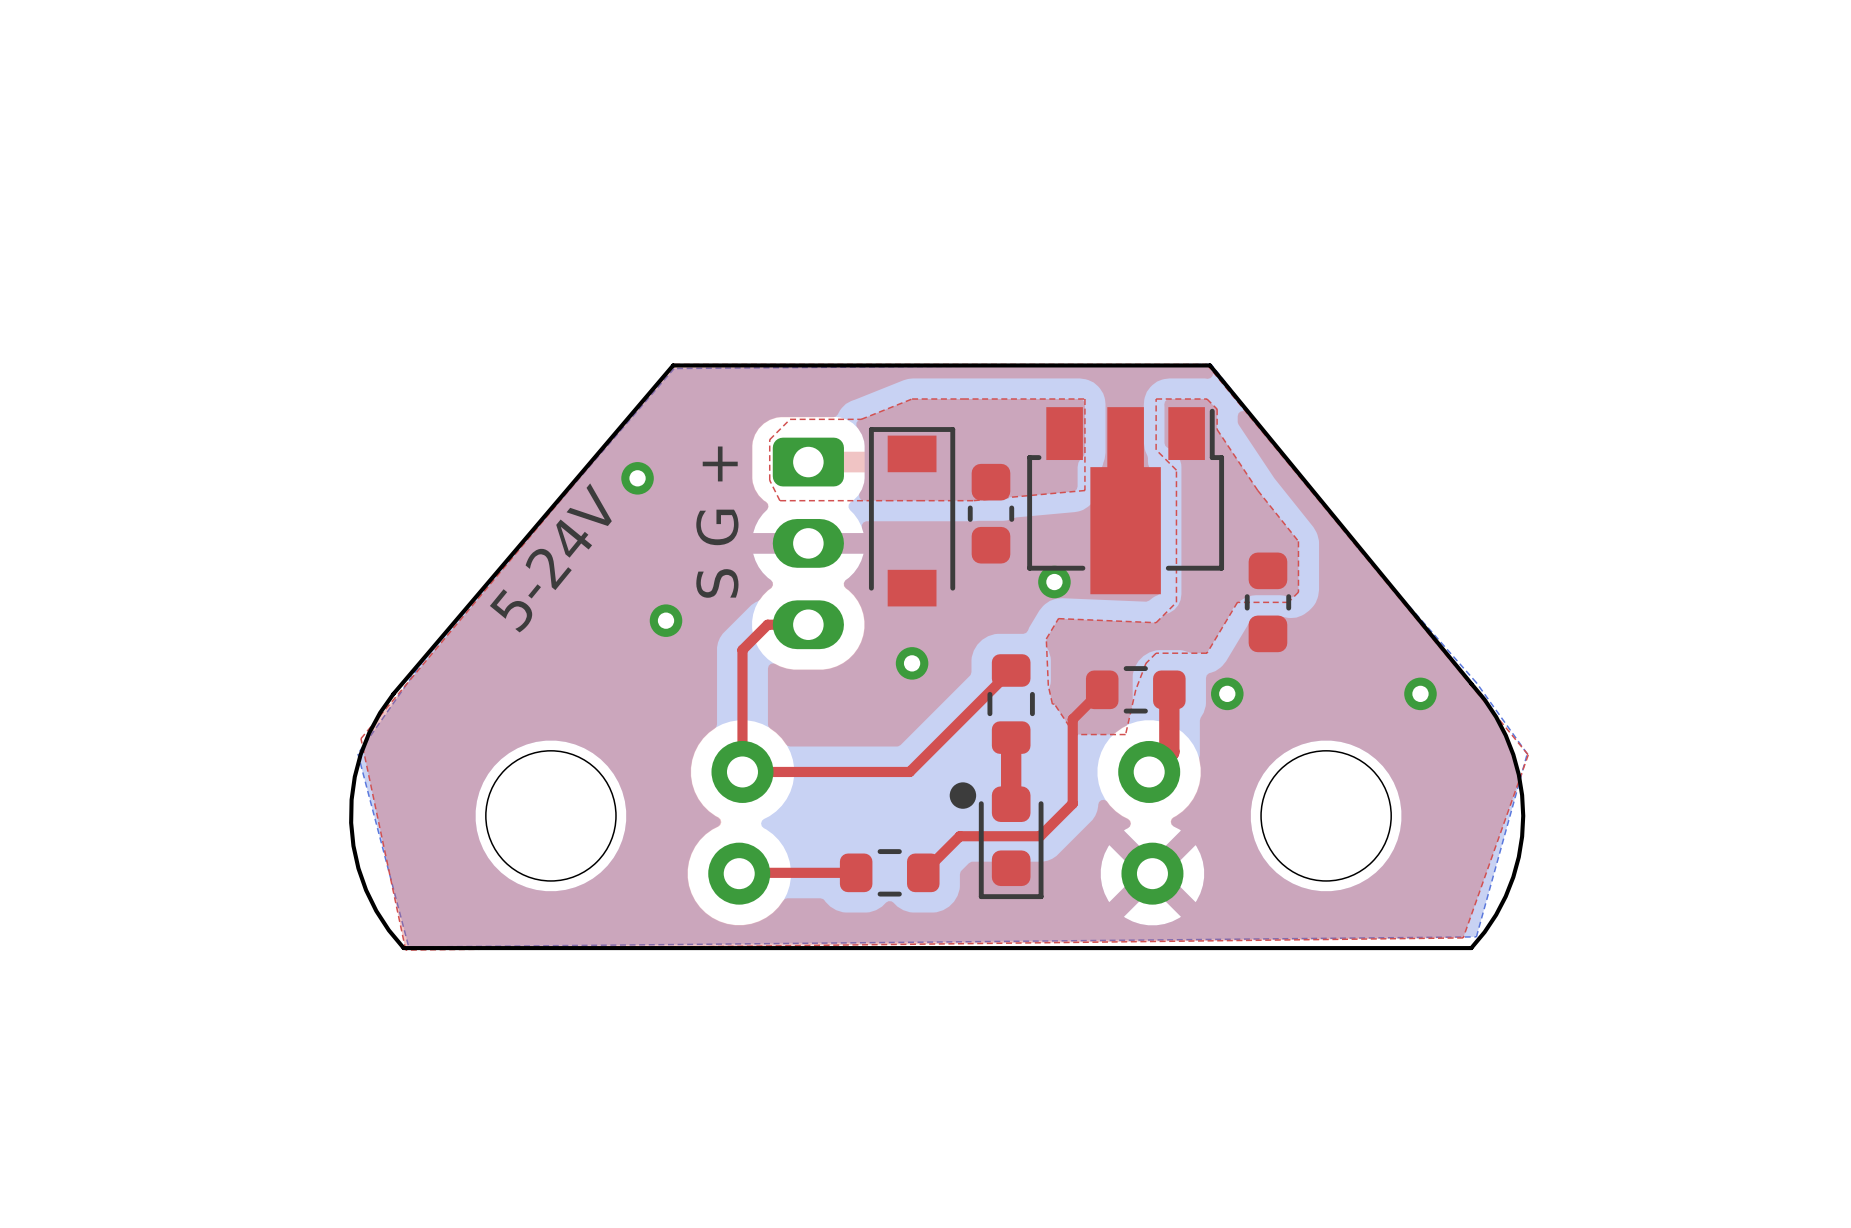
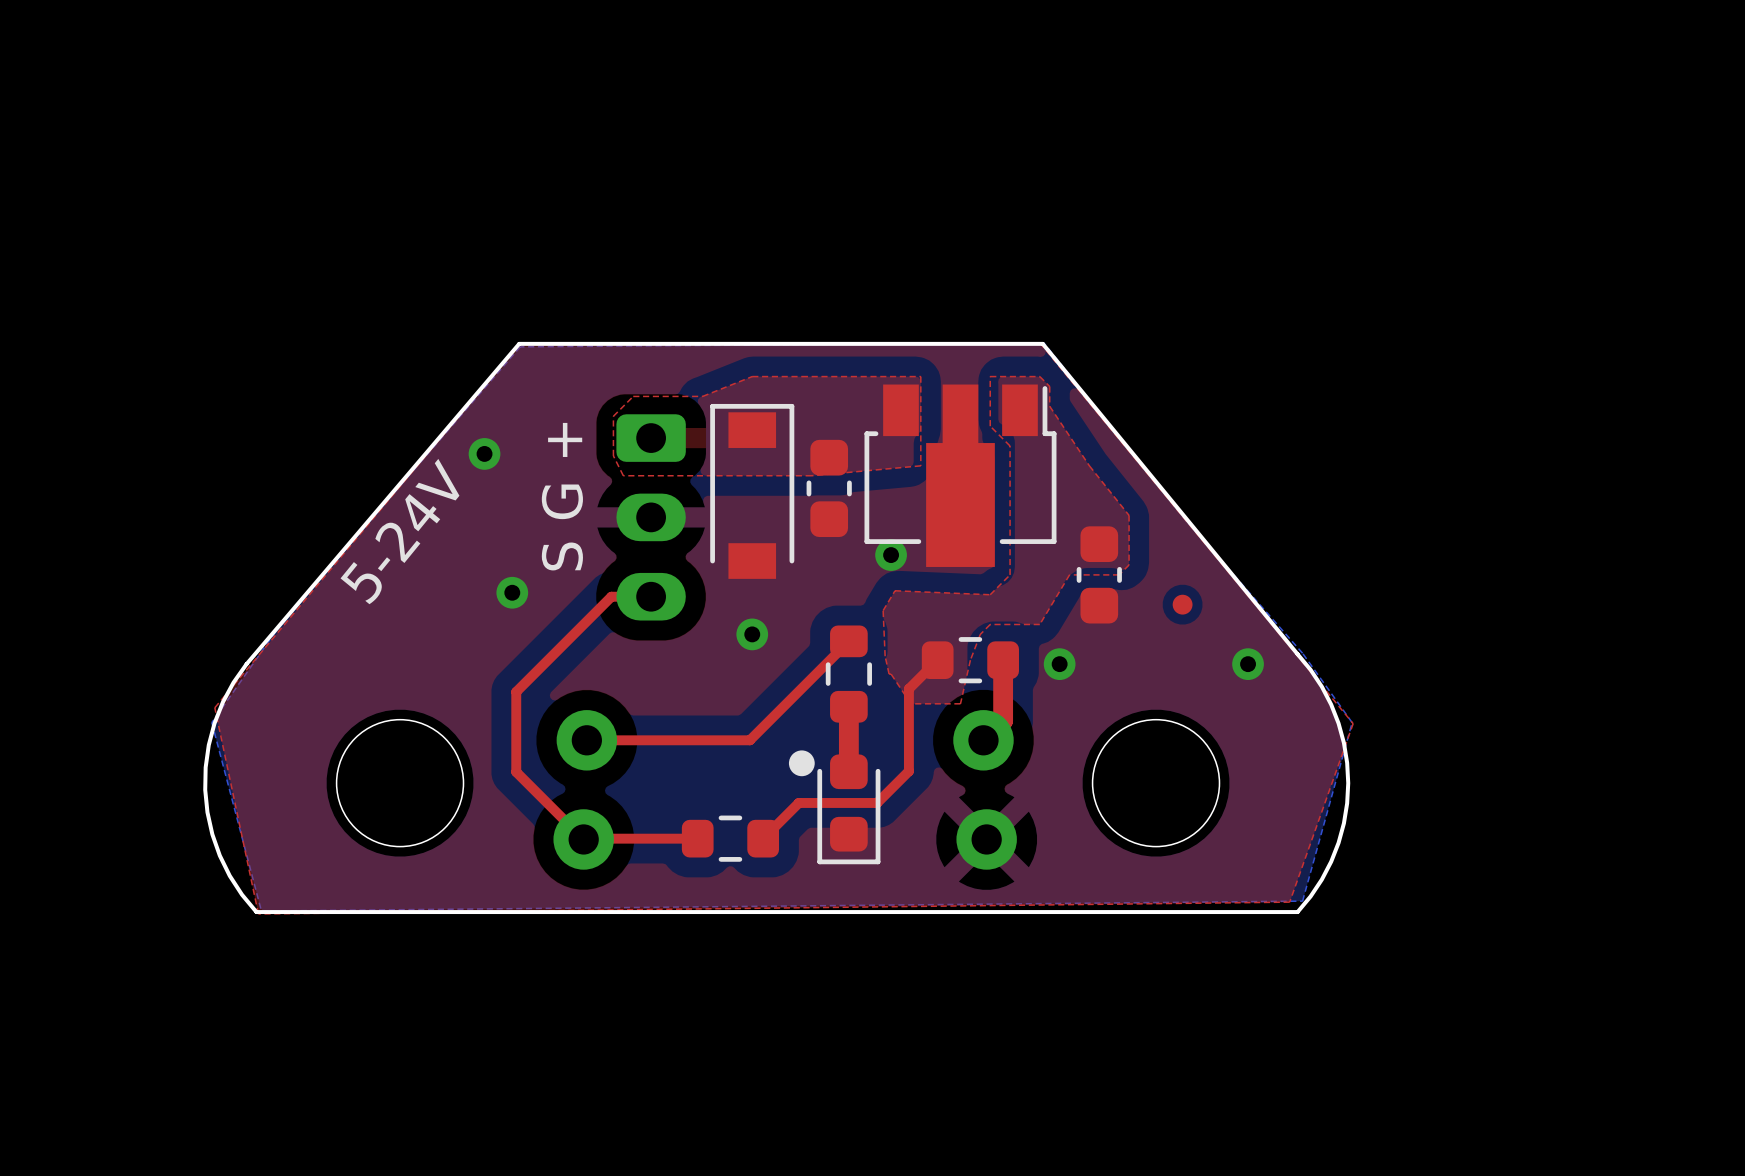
part: none -> (1182, 604)
top track: (742, 649) (742, 771) -> (586, 621) (516, 691) (516, 772) (583, 839)

